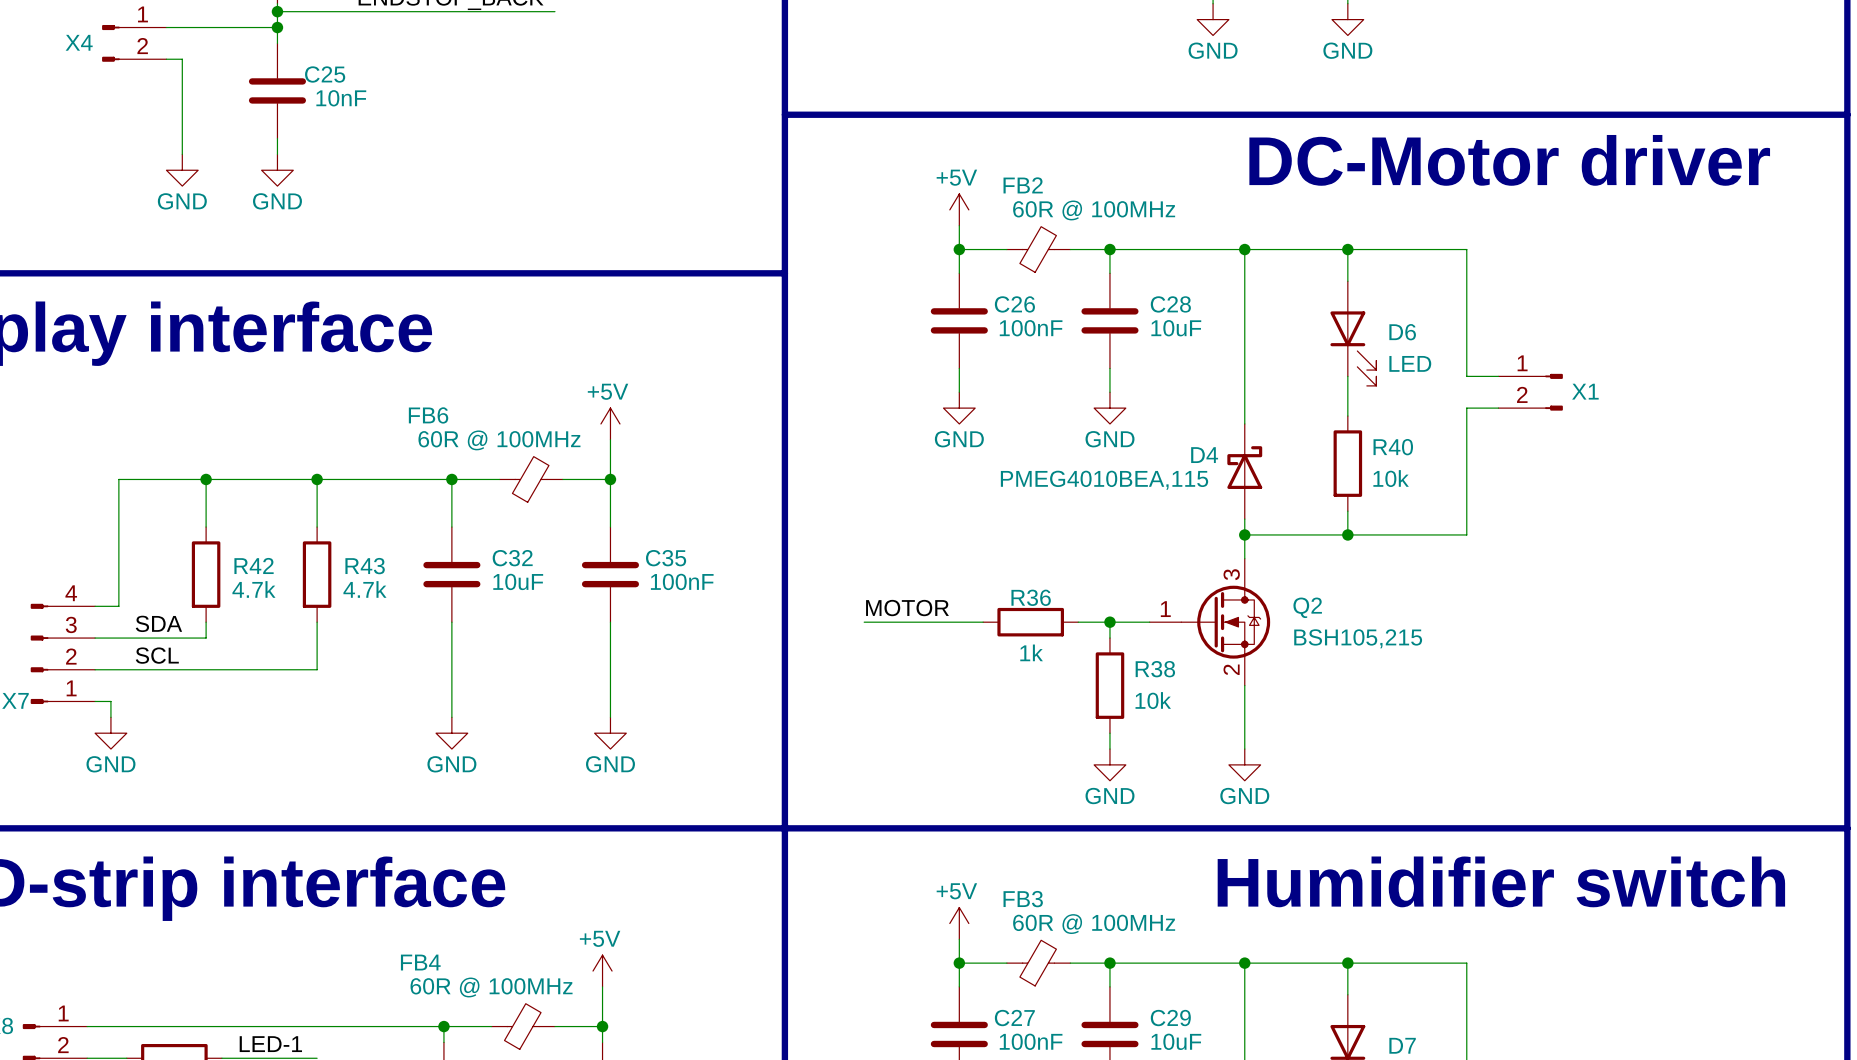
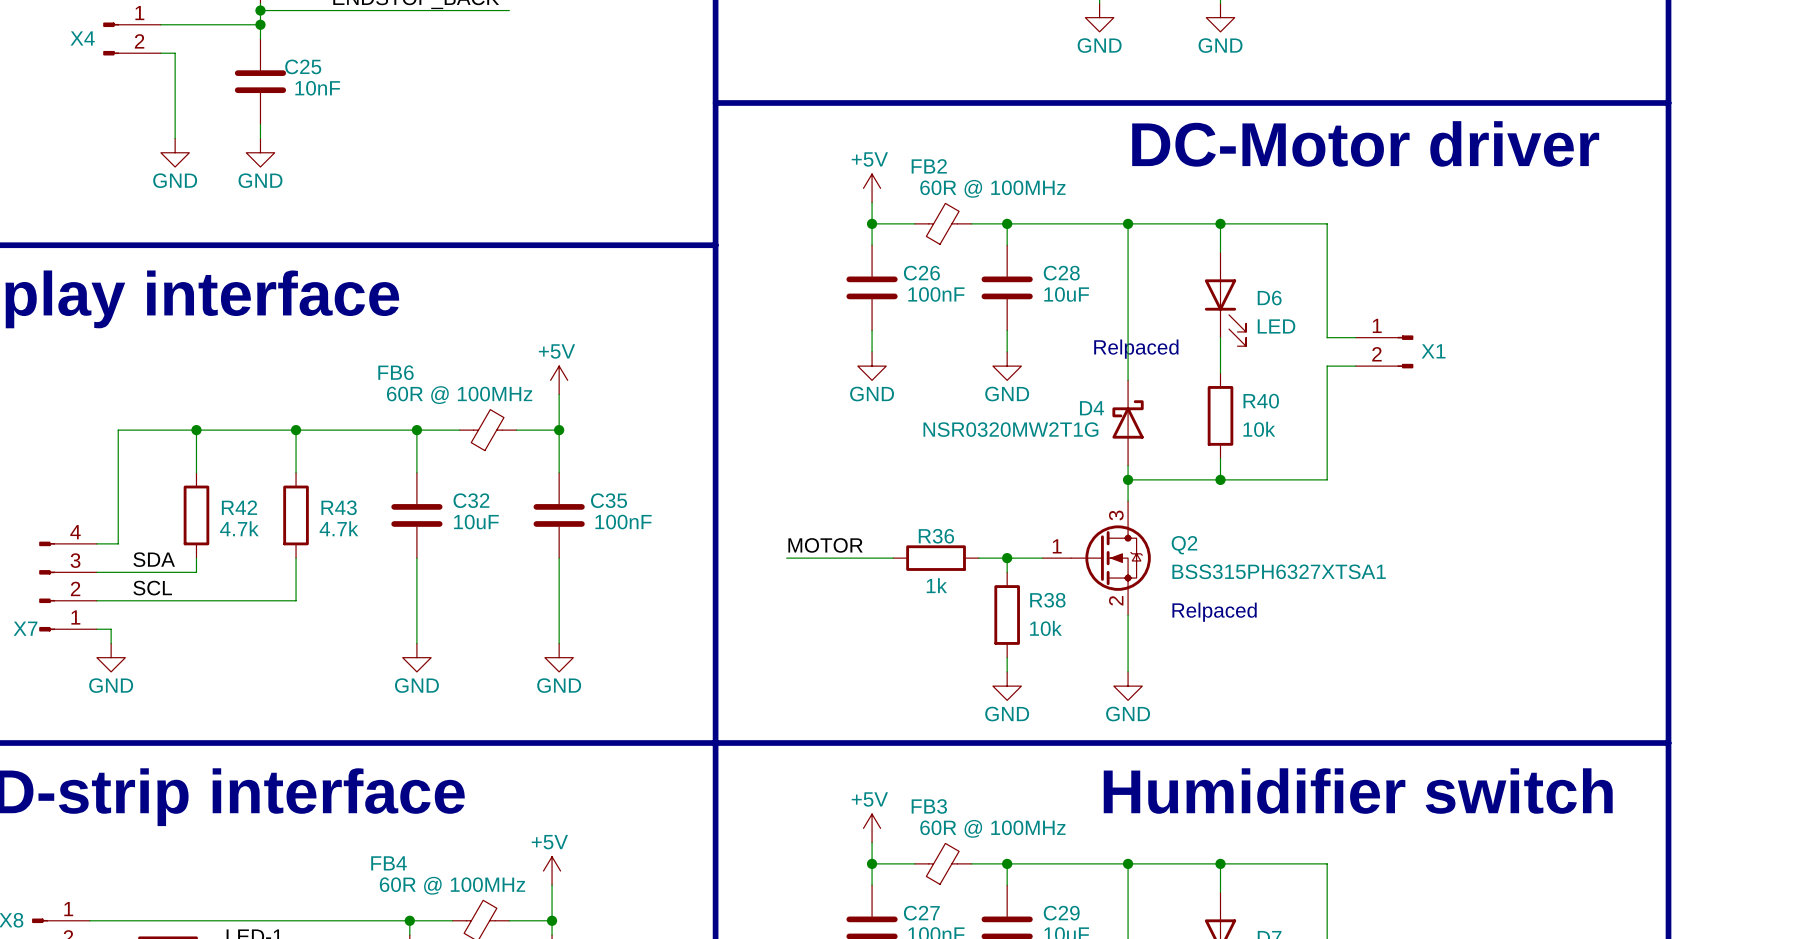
text: none -> Relpaced (1136, 349)
D4 value: PMEG4010BEA,115 (1104, 480) -> NSR0320MW2T1G (1010, 429)
Q2 value: BSH105,215 (1358, 638) -> BSS315PH6327XTSA1 (1279, 571)
text: none -> Relpaced (1214, 612)

